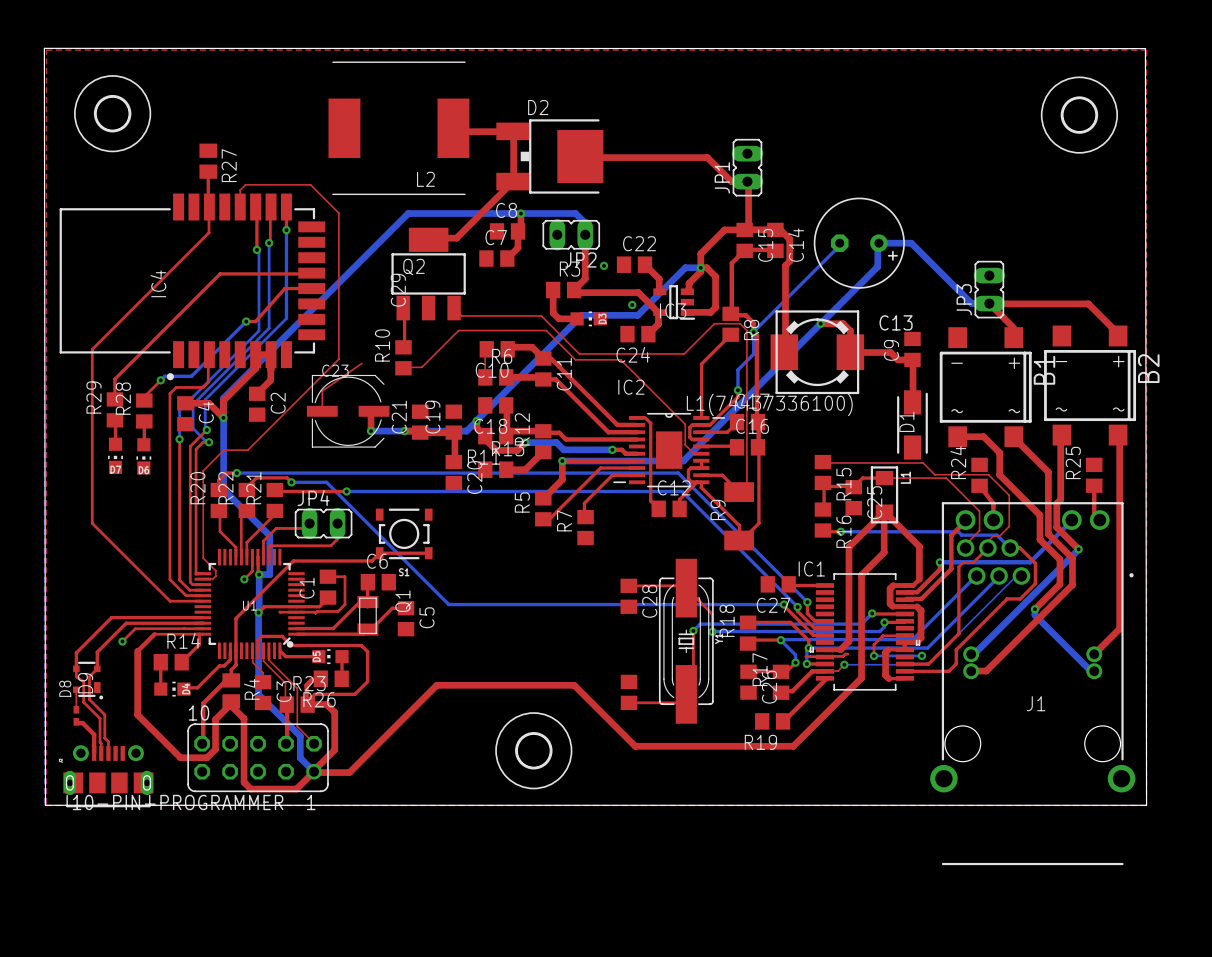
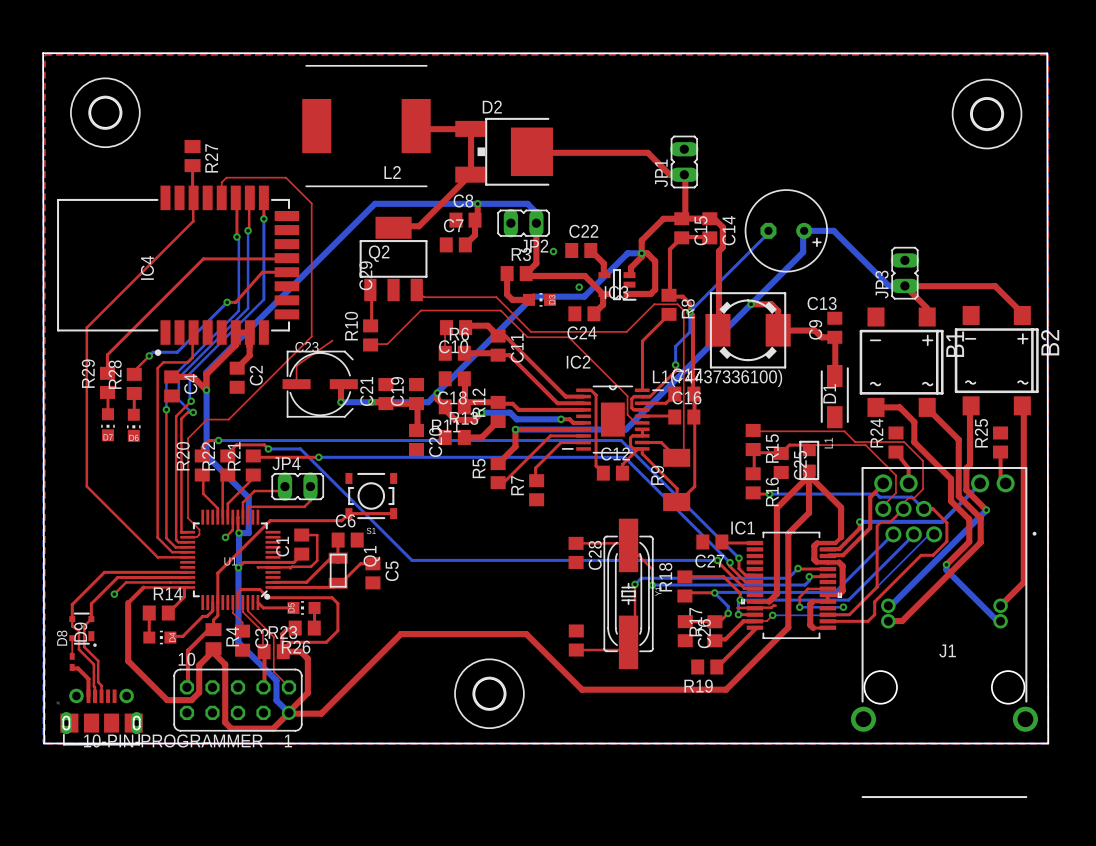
L1 footprint: [870, 466, 899, 524] -> [799, 440, 820, 481]

